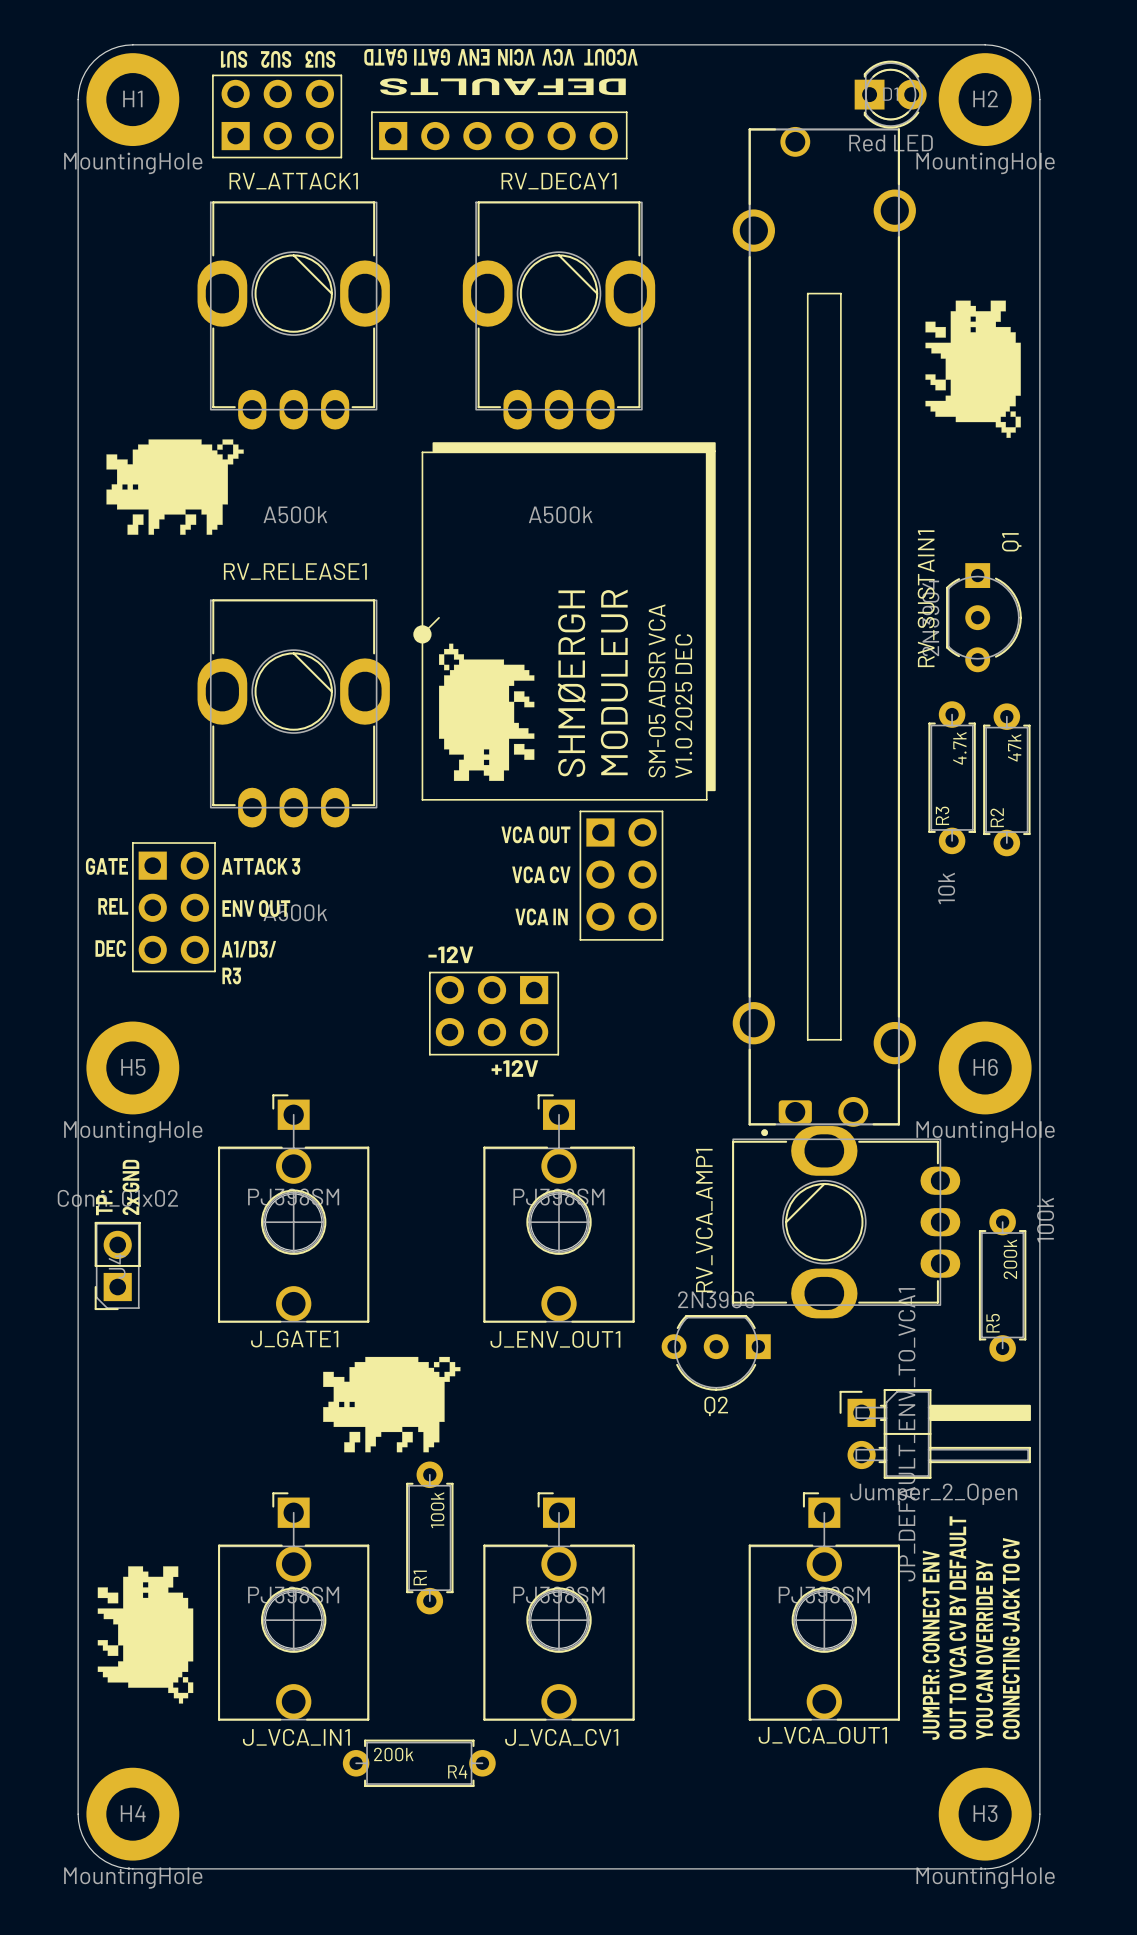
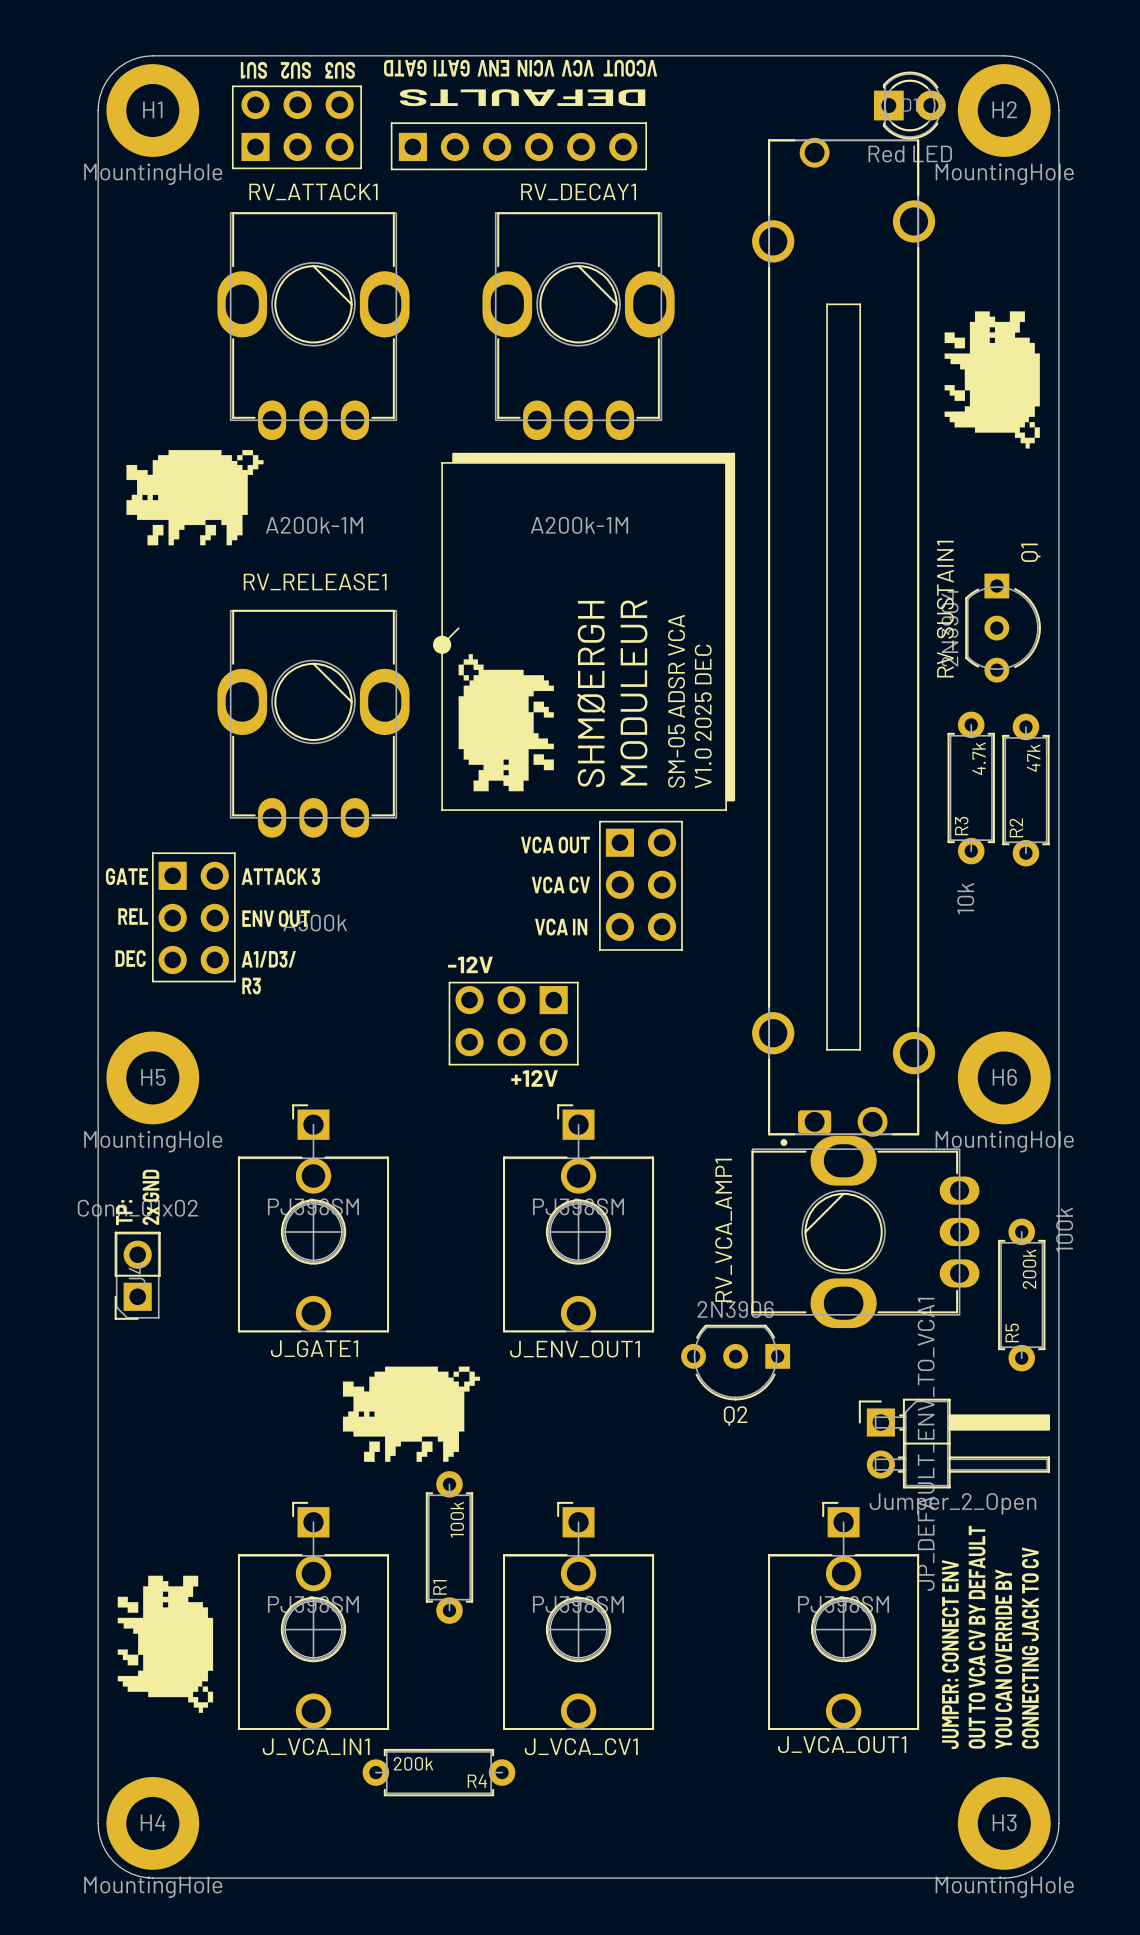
RV_ATTACK1 value: A500k (295, 514) -> A200k-1M (314, 525)
RV_DECAY1 value: A500k (560, 514) -> A200k-1M (579, 525)

